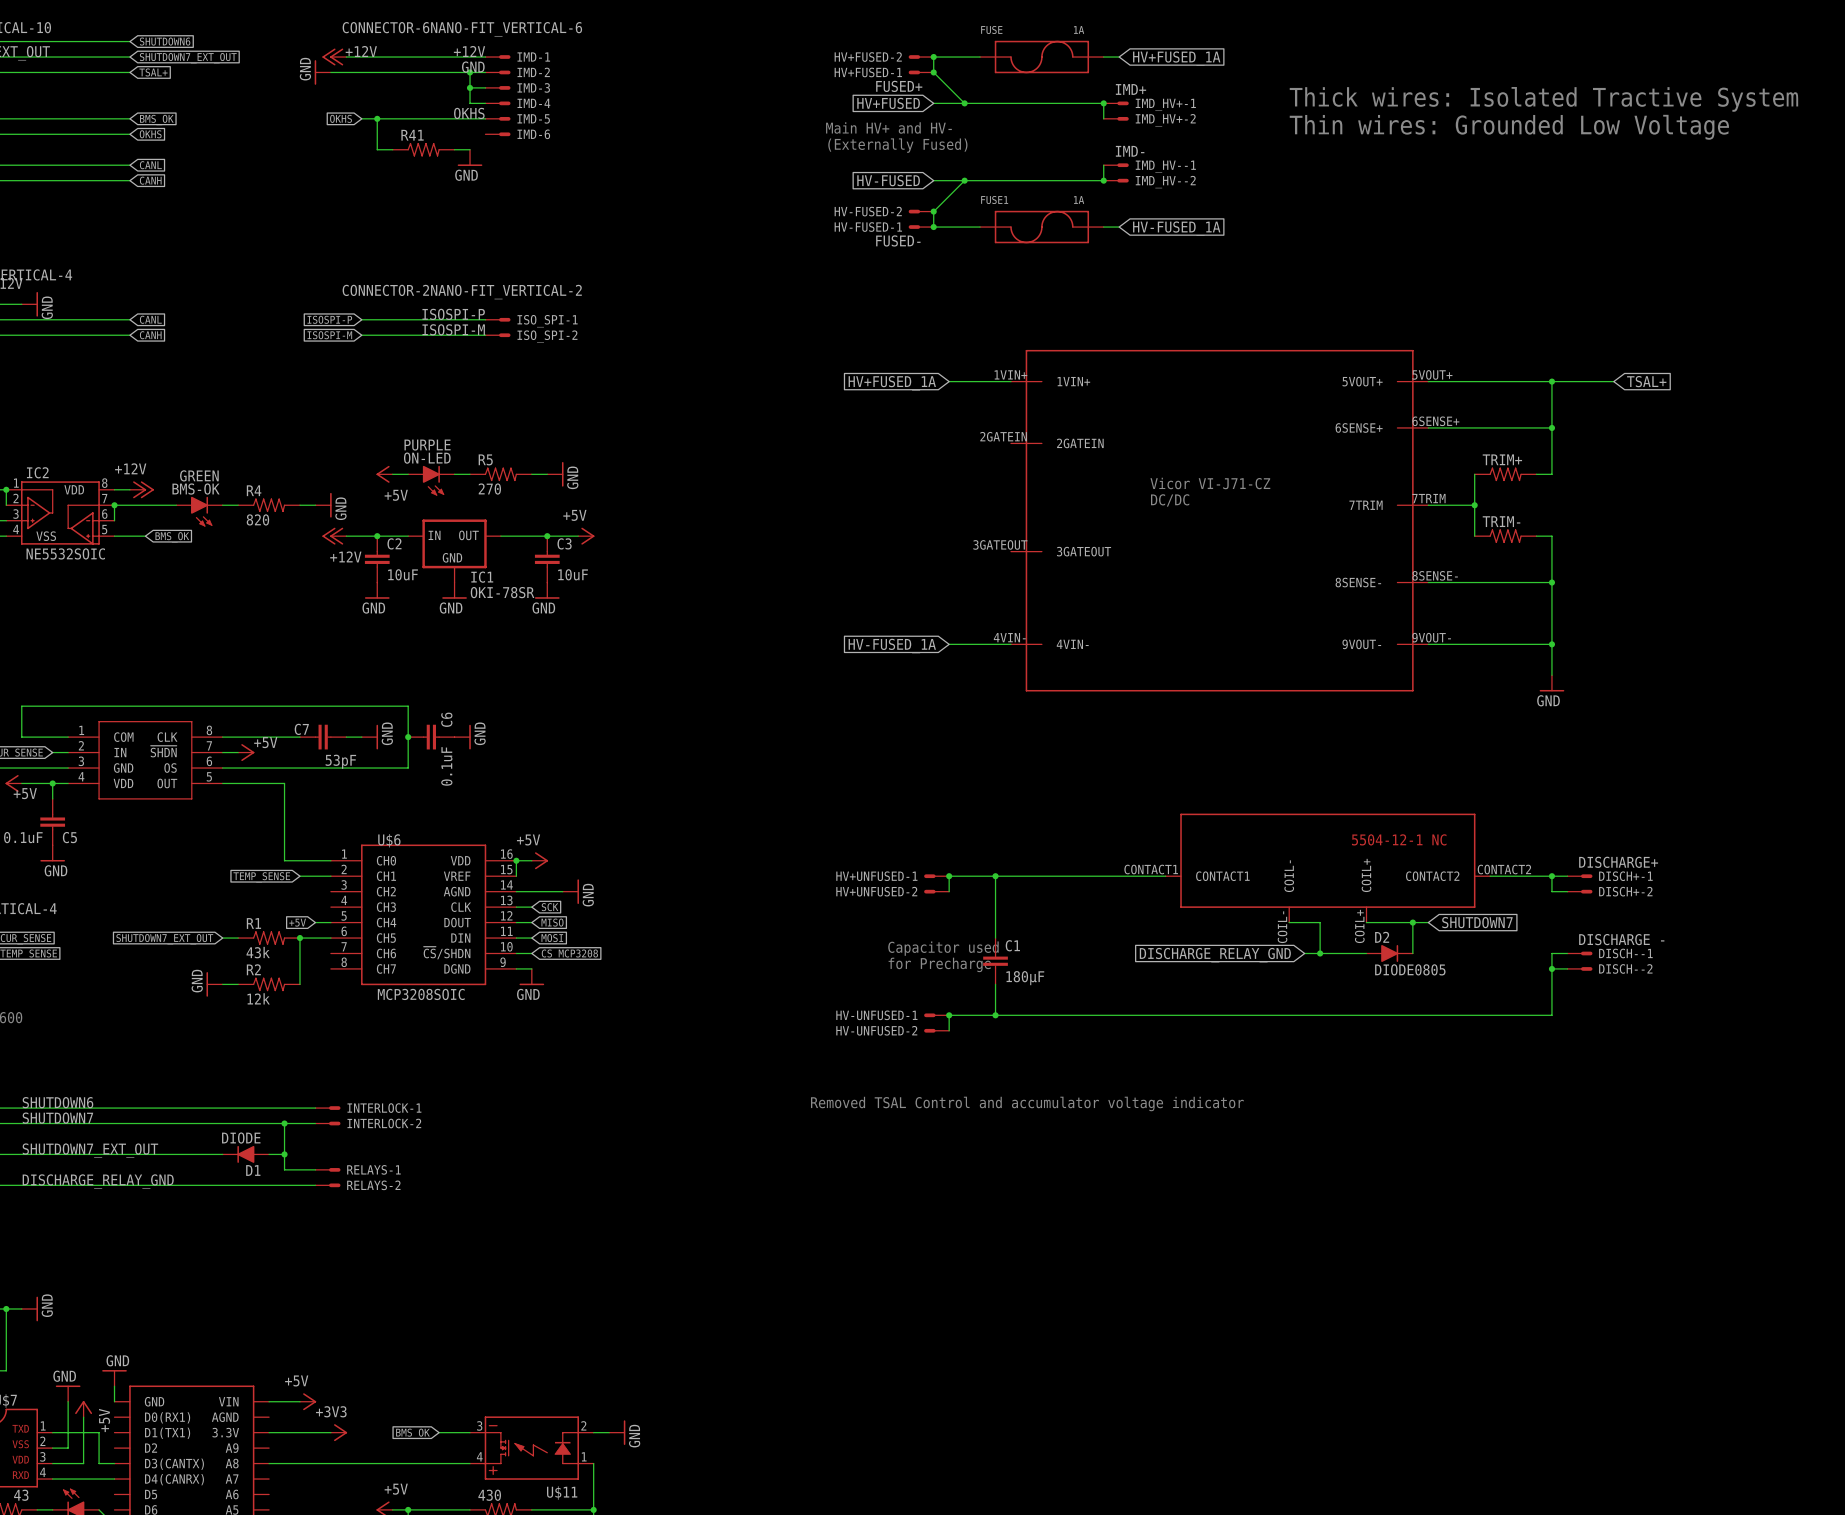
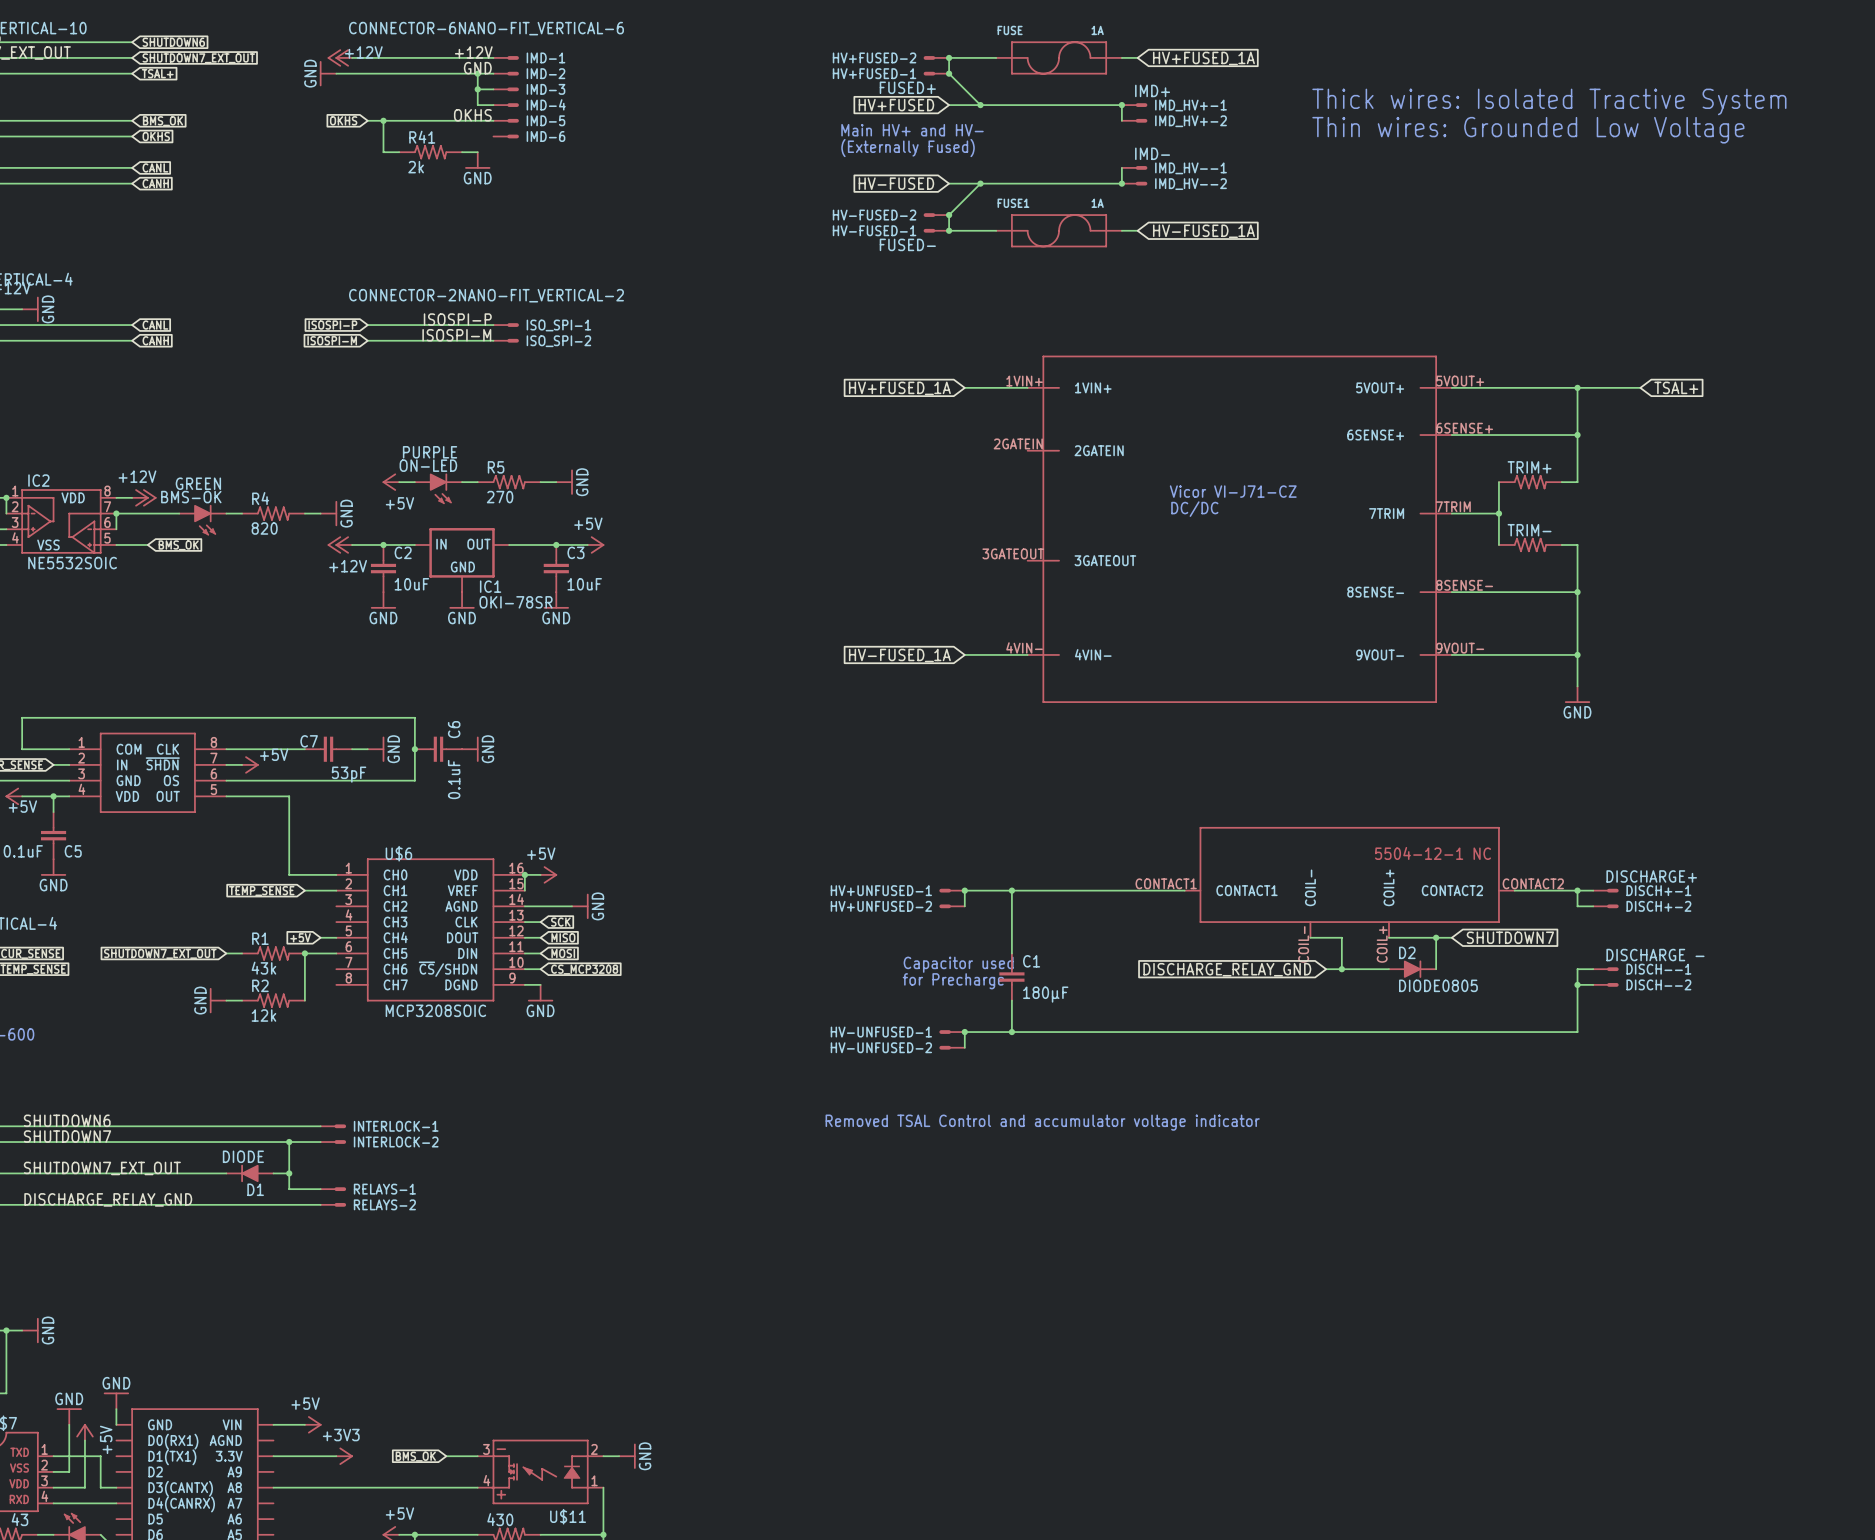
R41 value: none -> 2k (416, 167)

